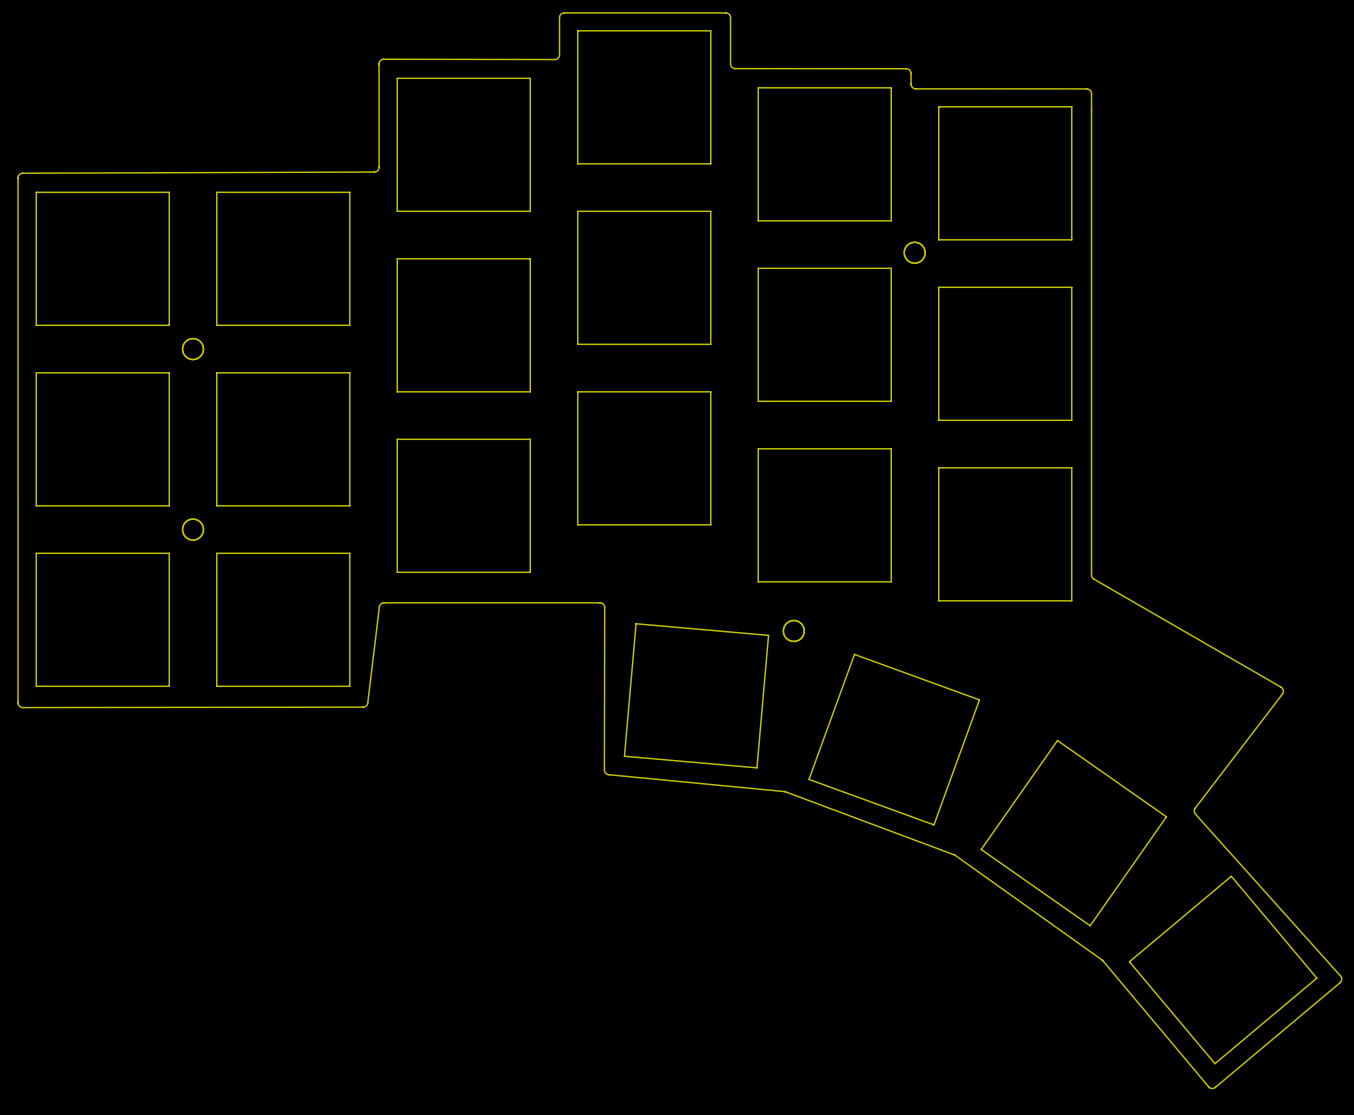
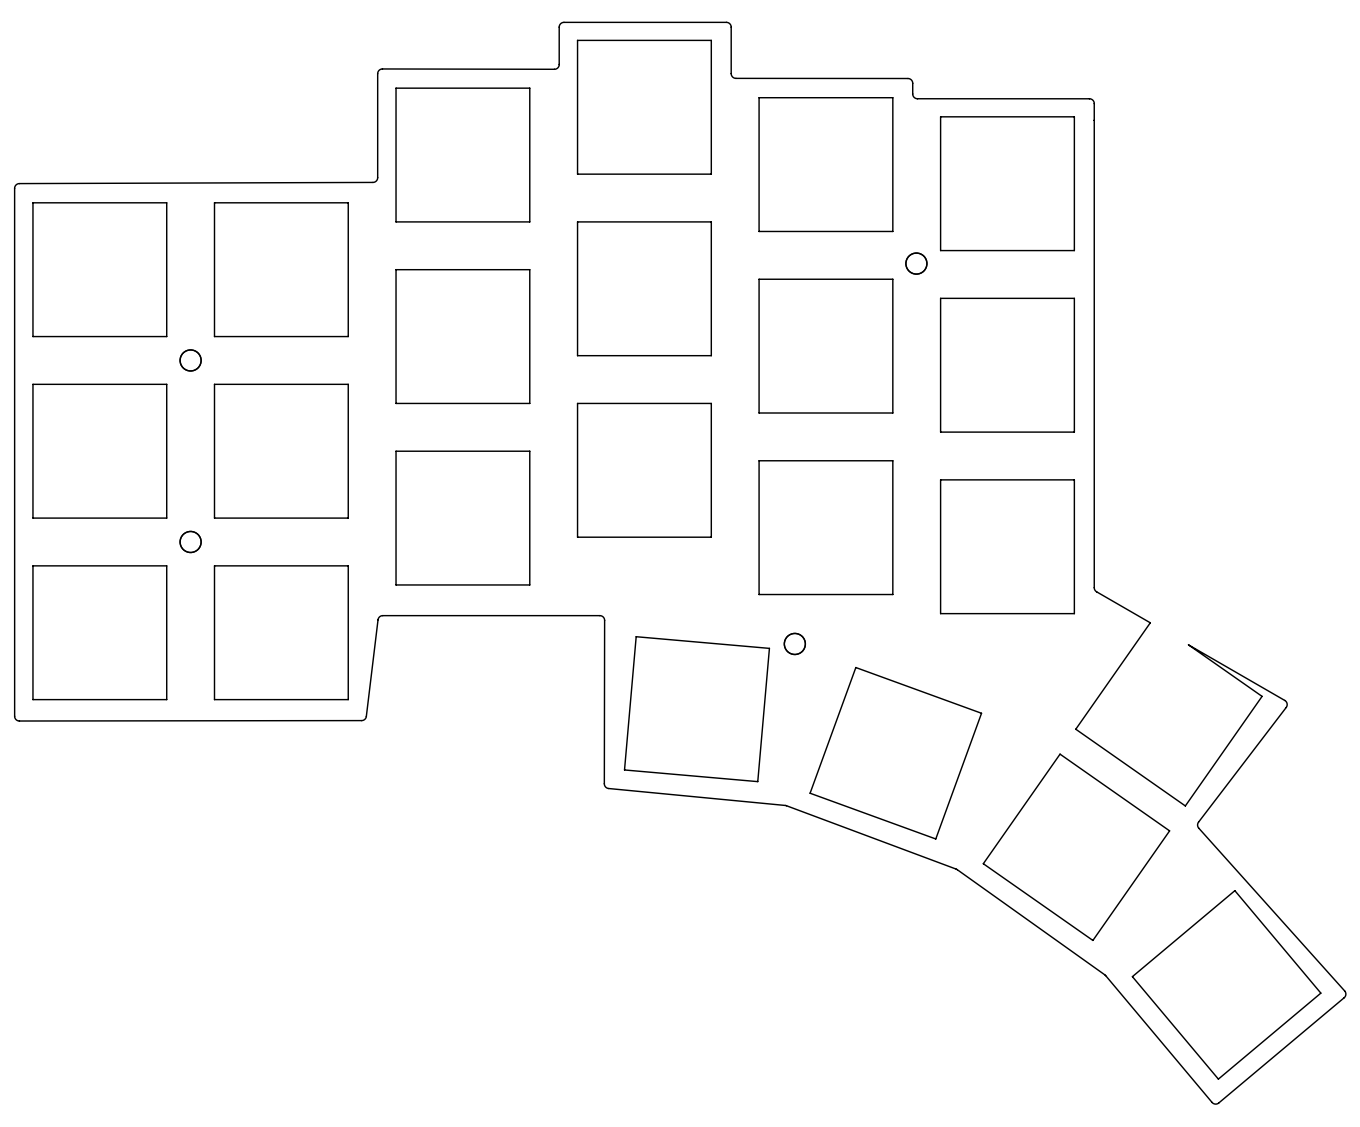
board edge: (1147, 609) (1185, 631) -> (1150, 622) (1075, 729) (1185, 805) (1262, 696) (1188, 644)

